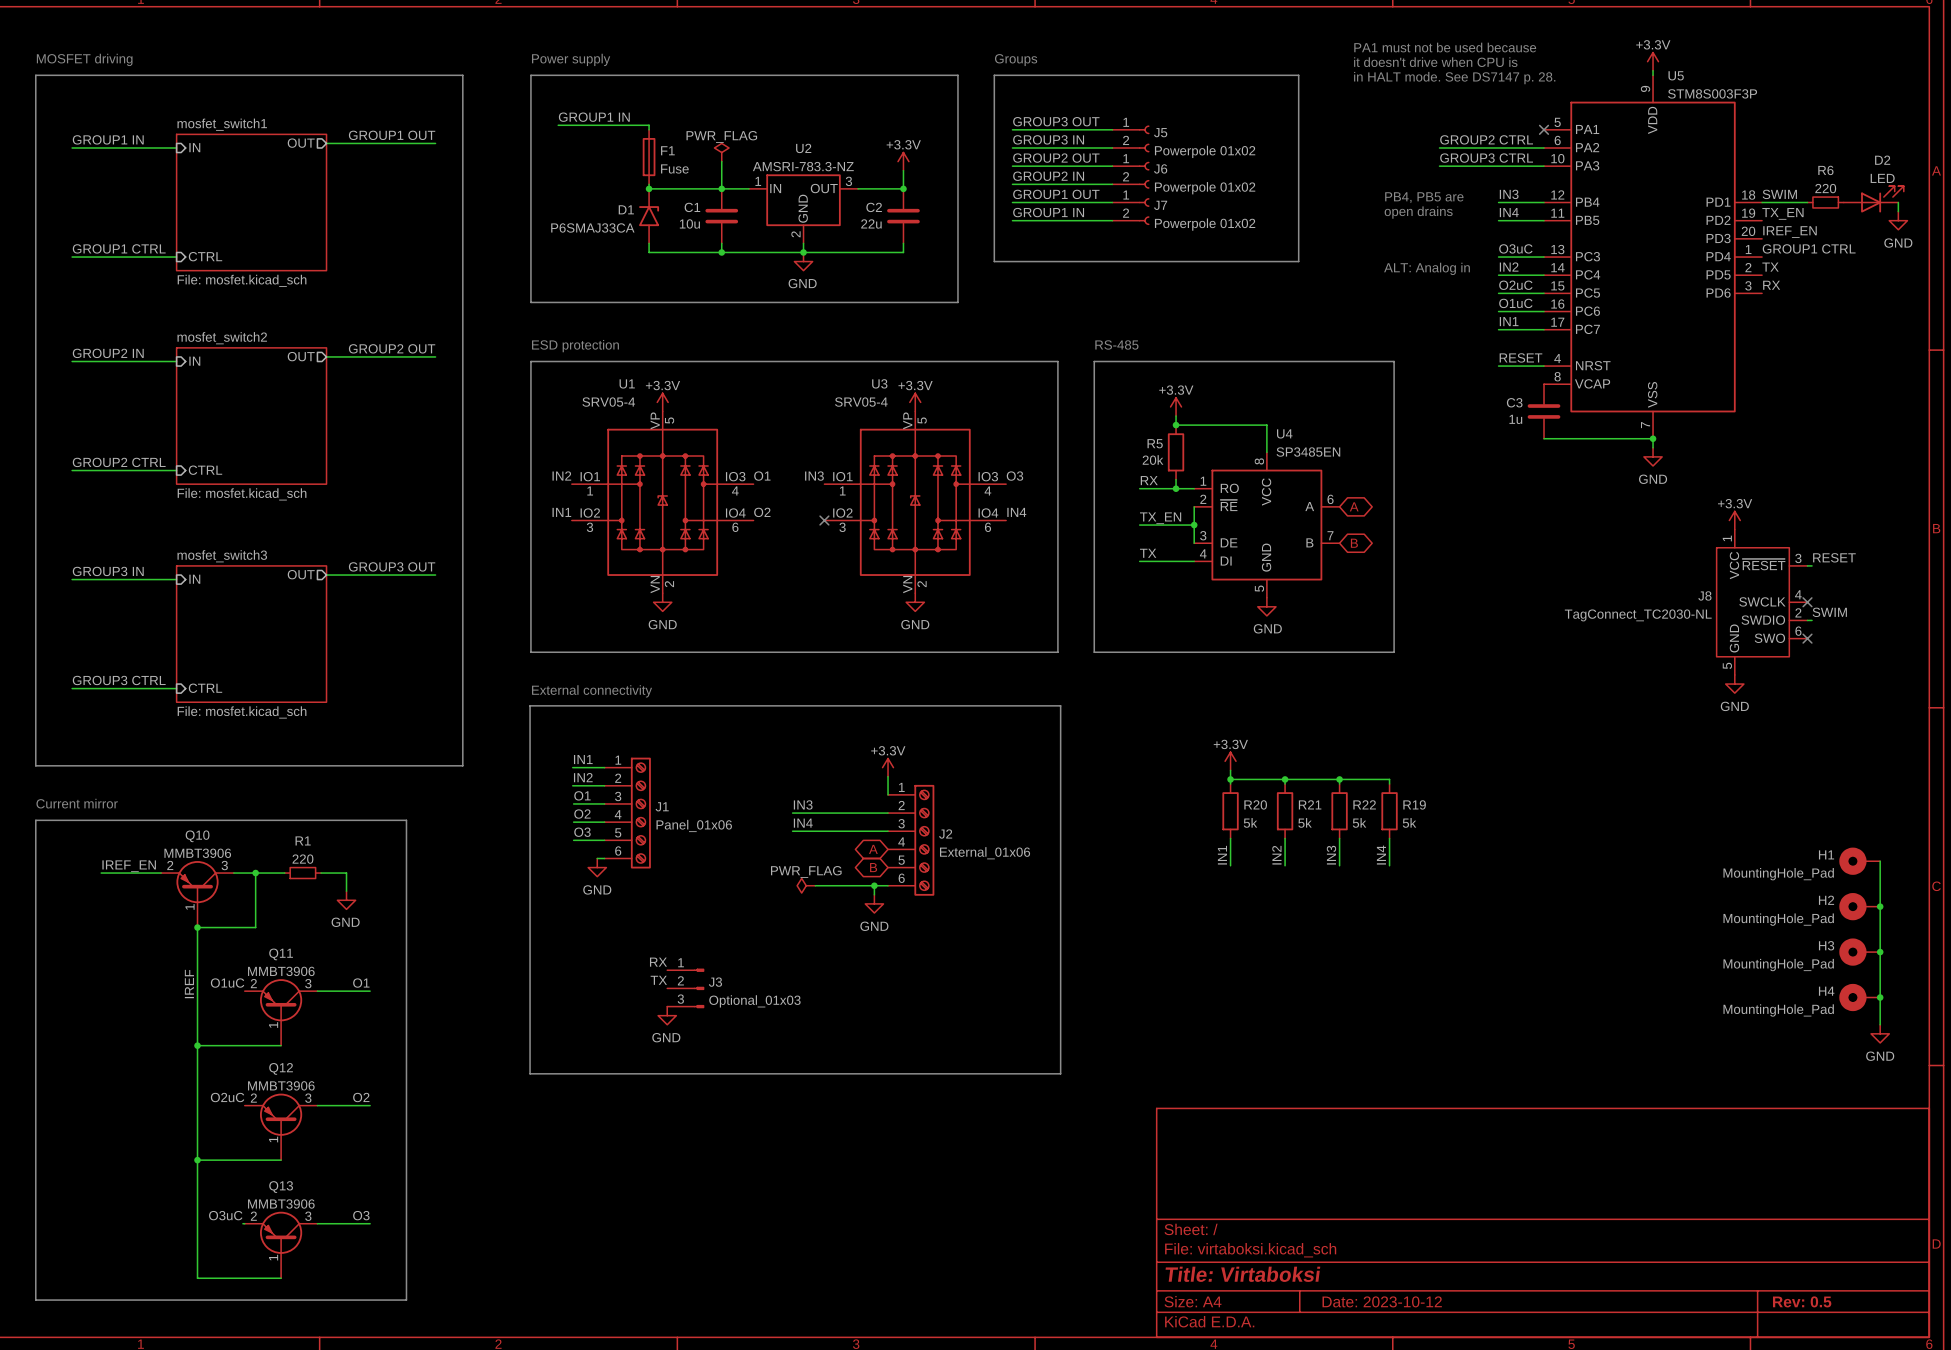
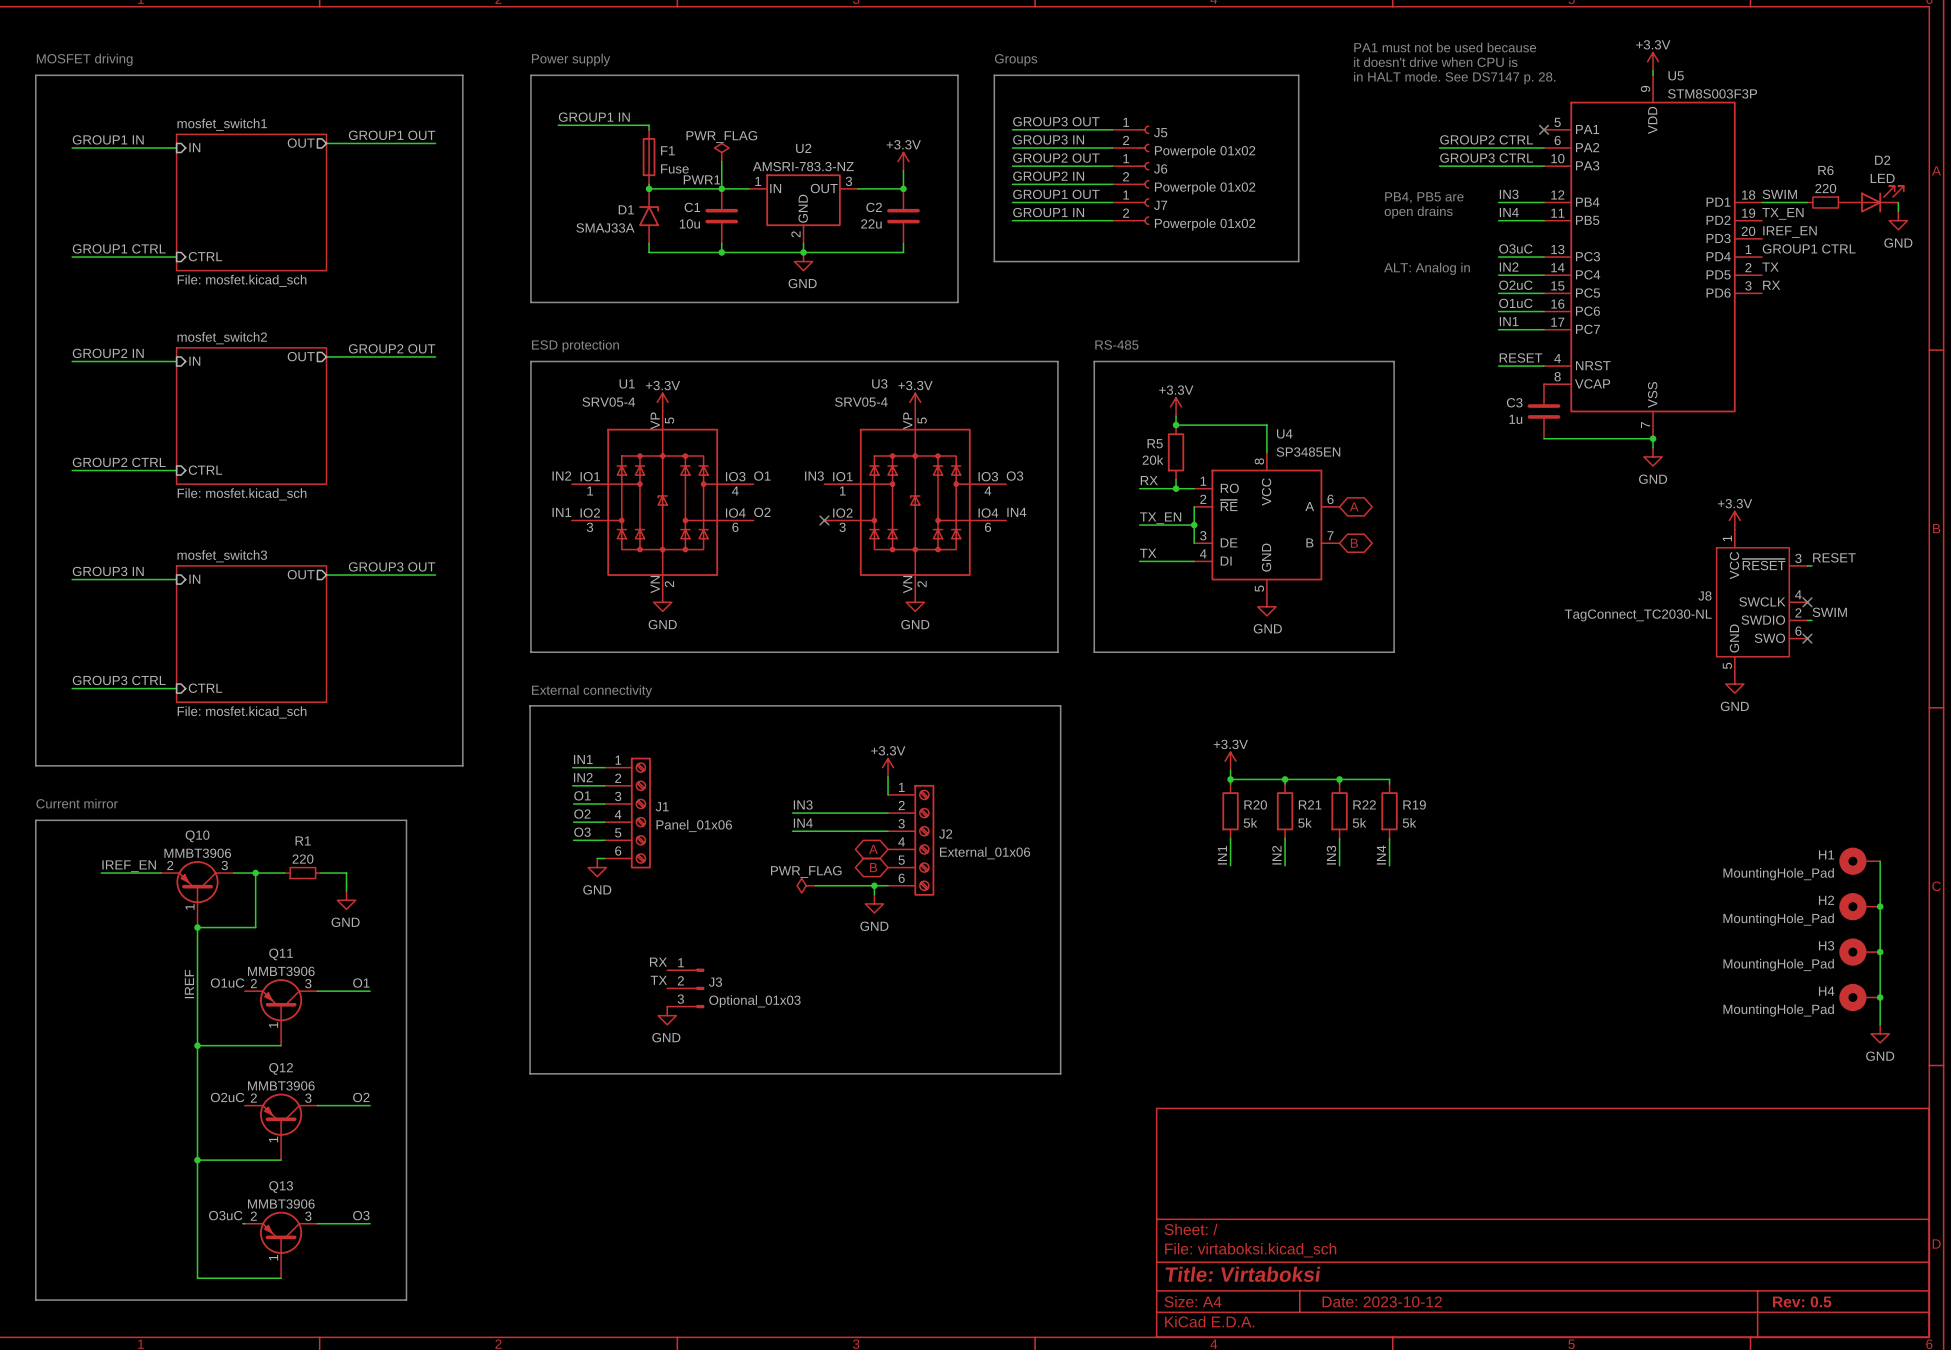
label: none -> PWR1 (701, 179)
D1 value: P6SMAJ33CA (592, 227) -> SMAJ33A (605, 227)

